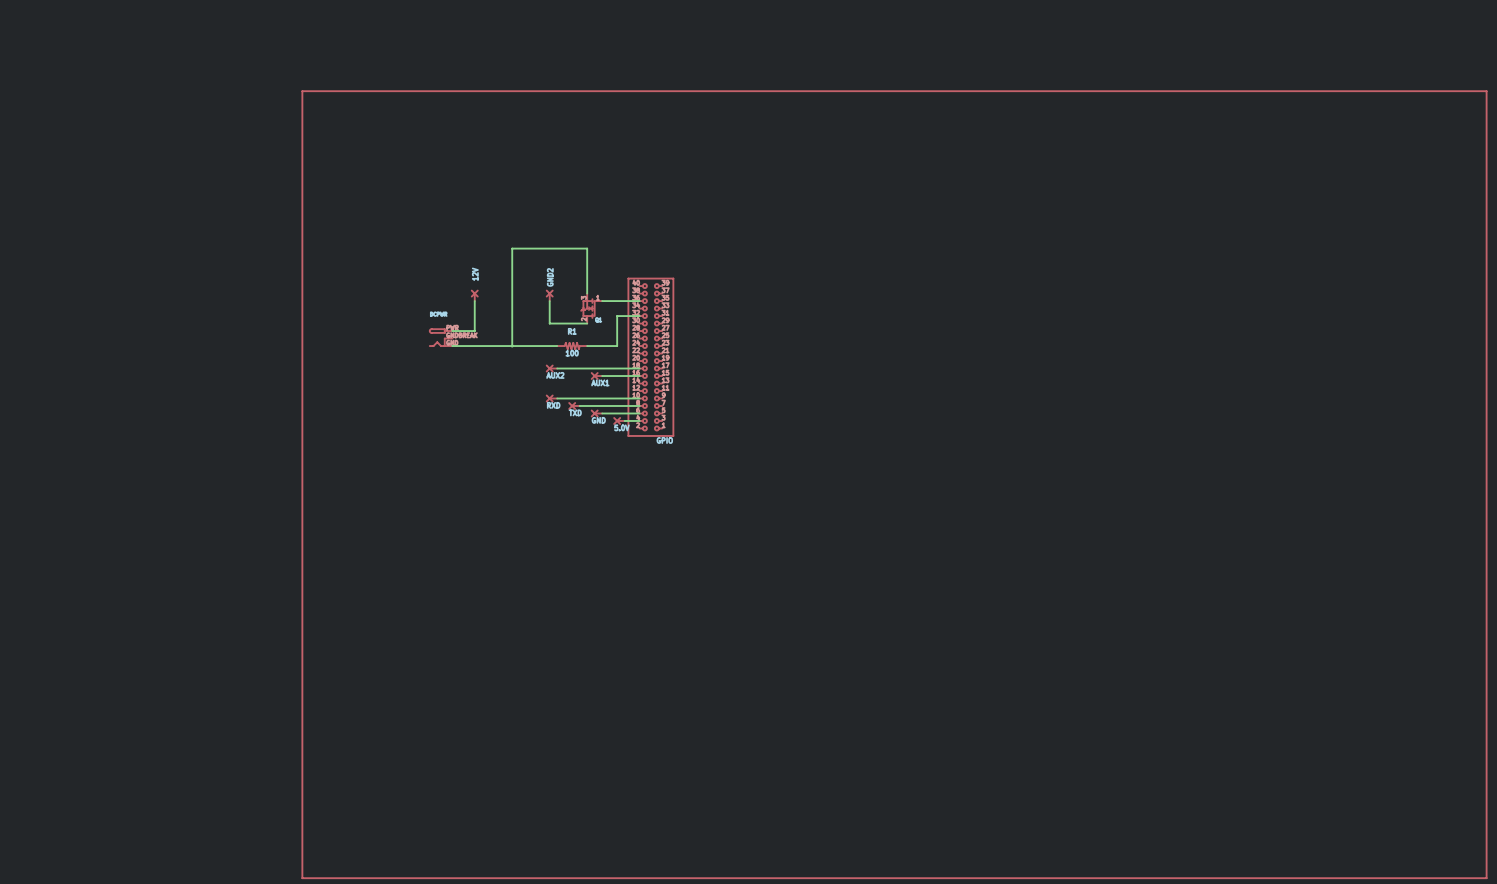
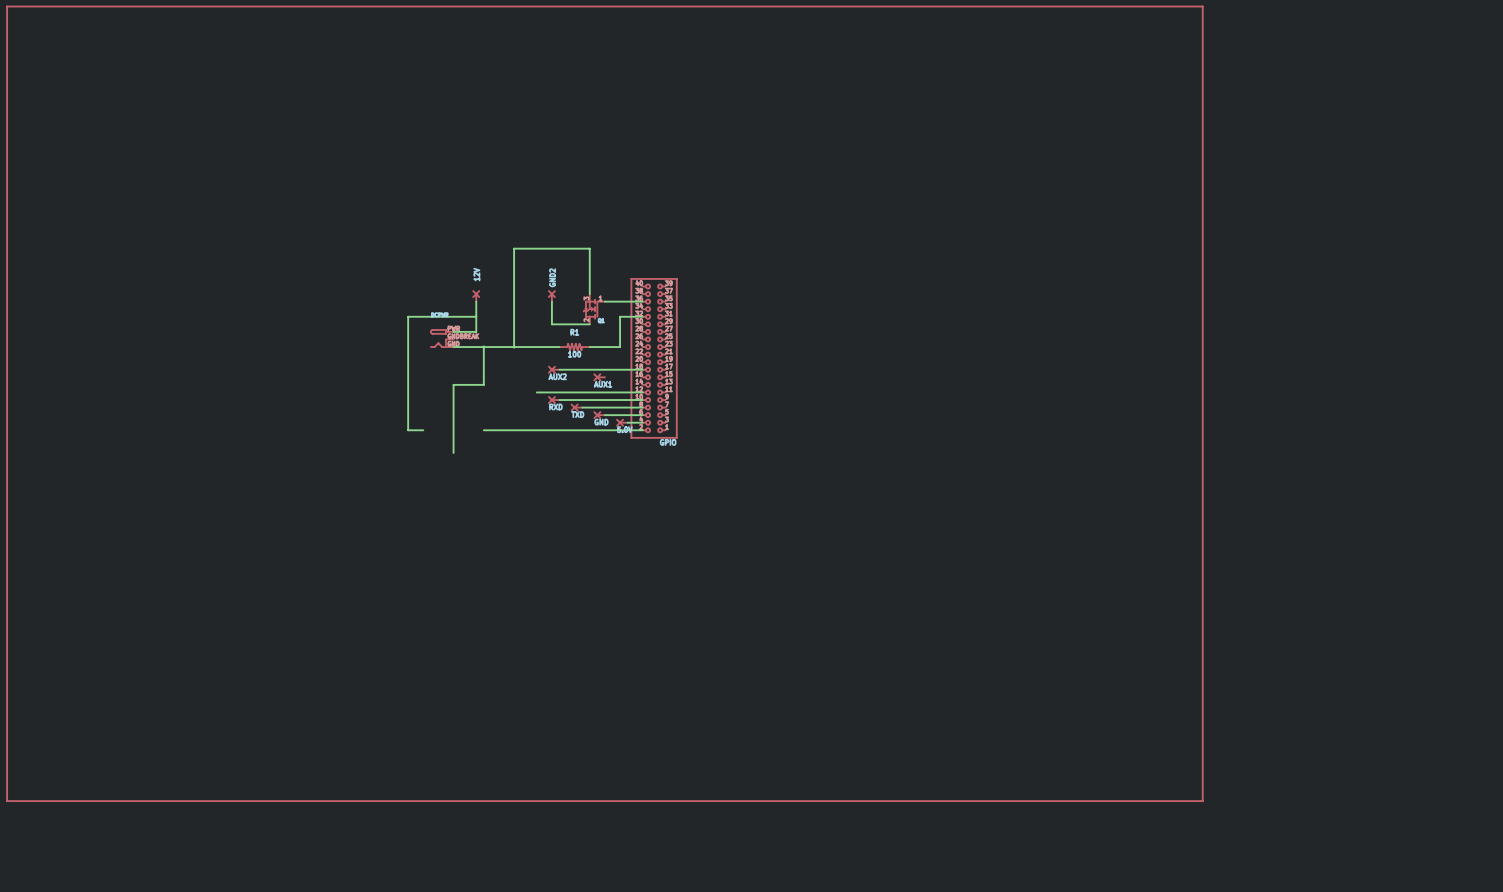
wire: none -> (476, 316) (408, 316) (408, 430) (423, 430)
wire: none -> (483, 347) (483, 384) (453, 384) (453, 452)
wire: (602, 376) (639, 376) -> none
wire: none -> (536, 392) (642, 392)
part: none -> (604, 403)
wire: none -> (483, 430) (642, 430)
part: (894, 484) -> none

